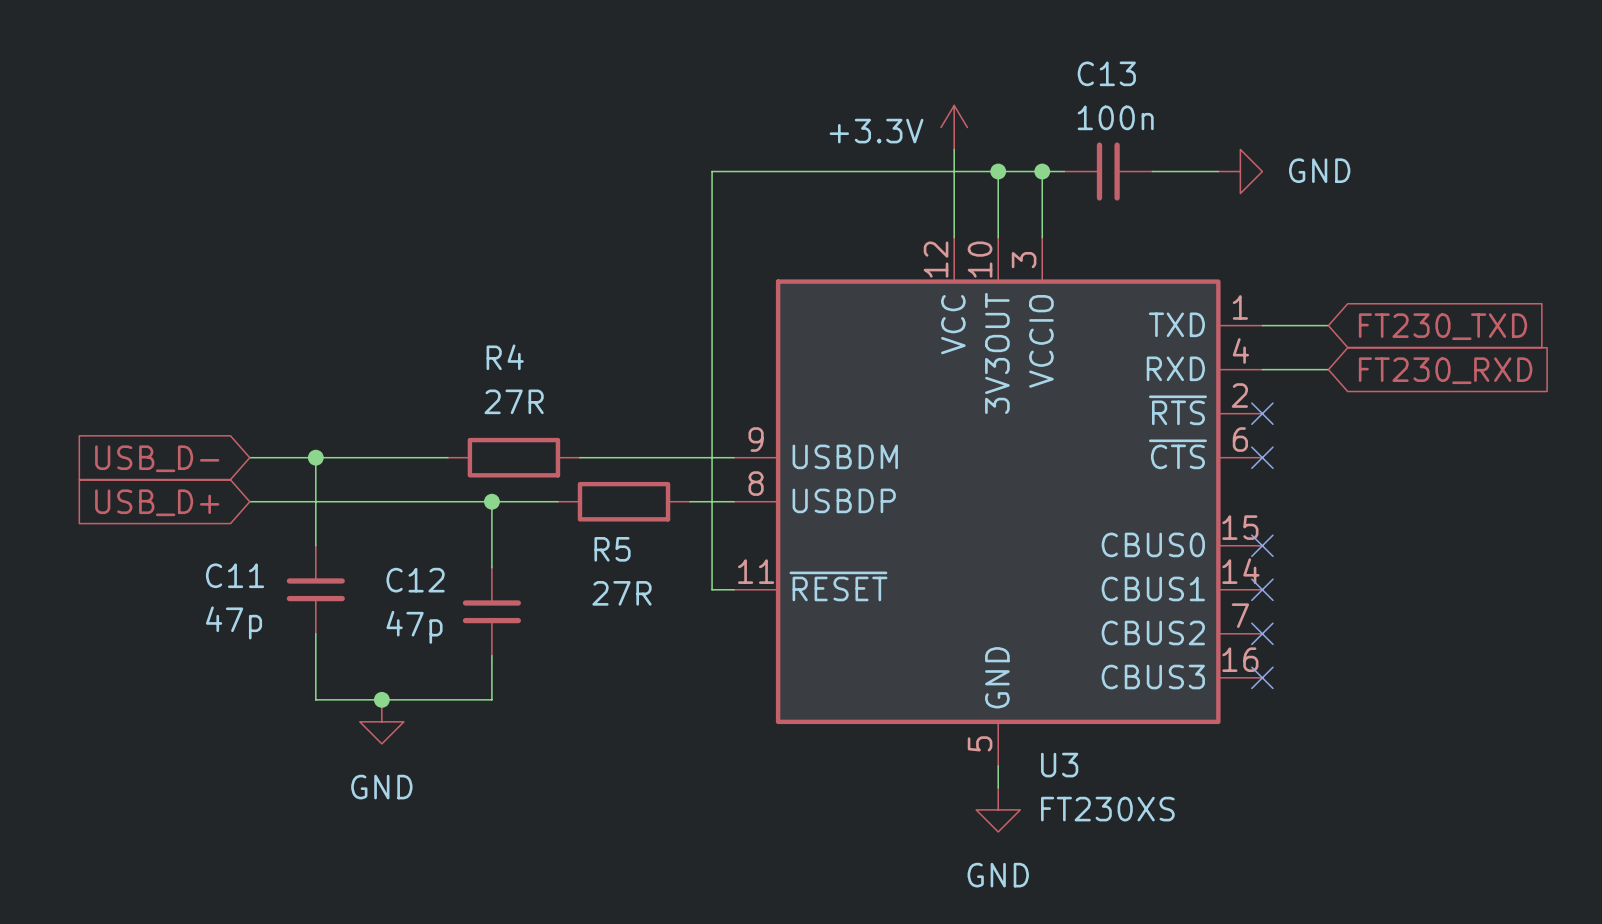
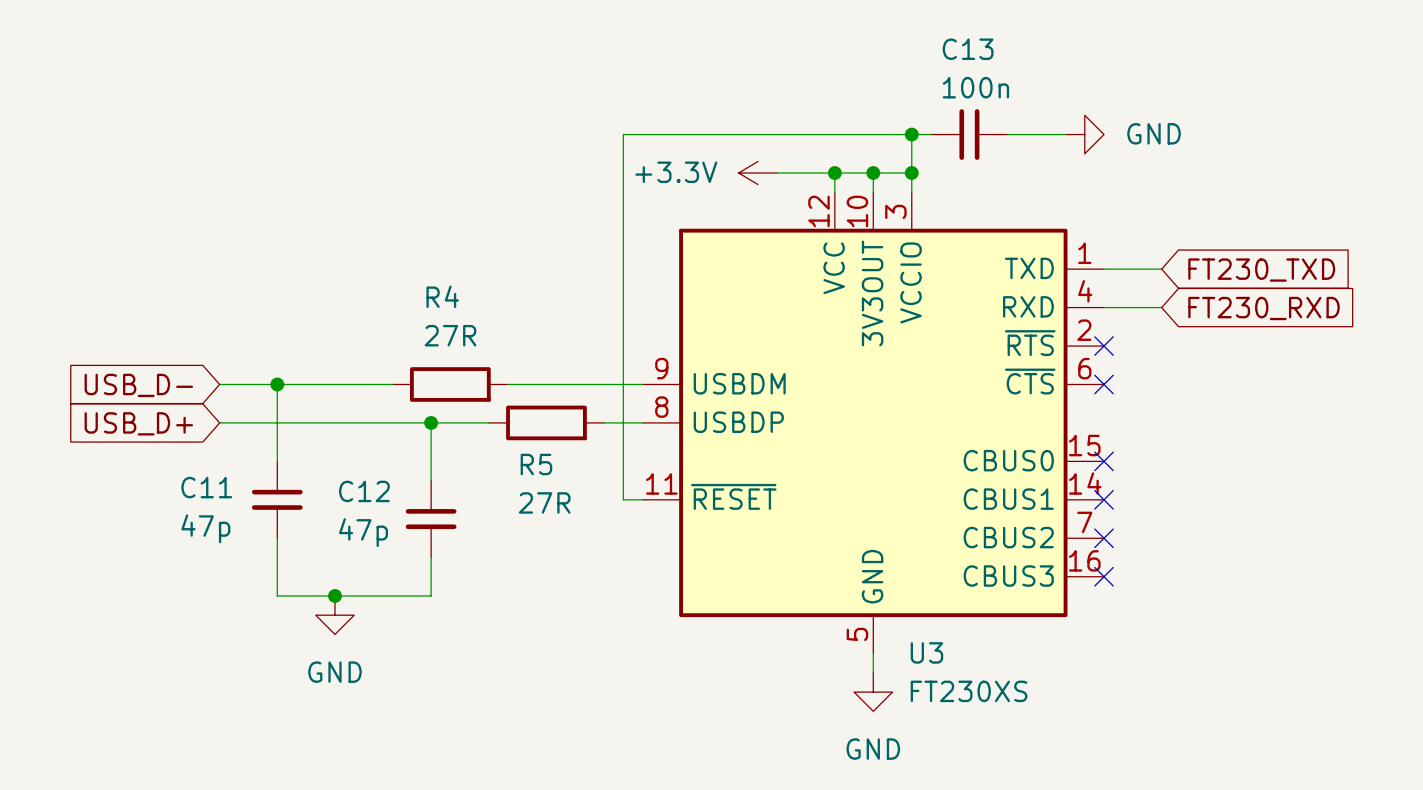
power symbol rotation: 0° (954, 127) -> 90° counterclockwise (757, 173)
power symbol position: +3.3V (954, 127) -> +3.3V (757, 173)
wire: (954, 149) (954, 215) -> none
wire: (998, 171) (998, 215) -> none
junction: (998, 171) -> none
wire: none -> (777, 173) (911, 173)
junction: none -> (834, 173)
junction: none -> (873, 173)
junction: none -> (911, 173)

